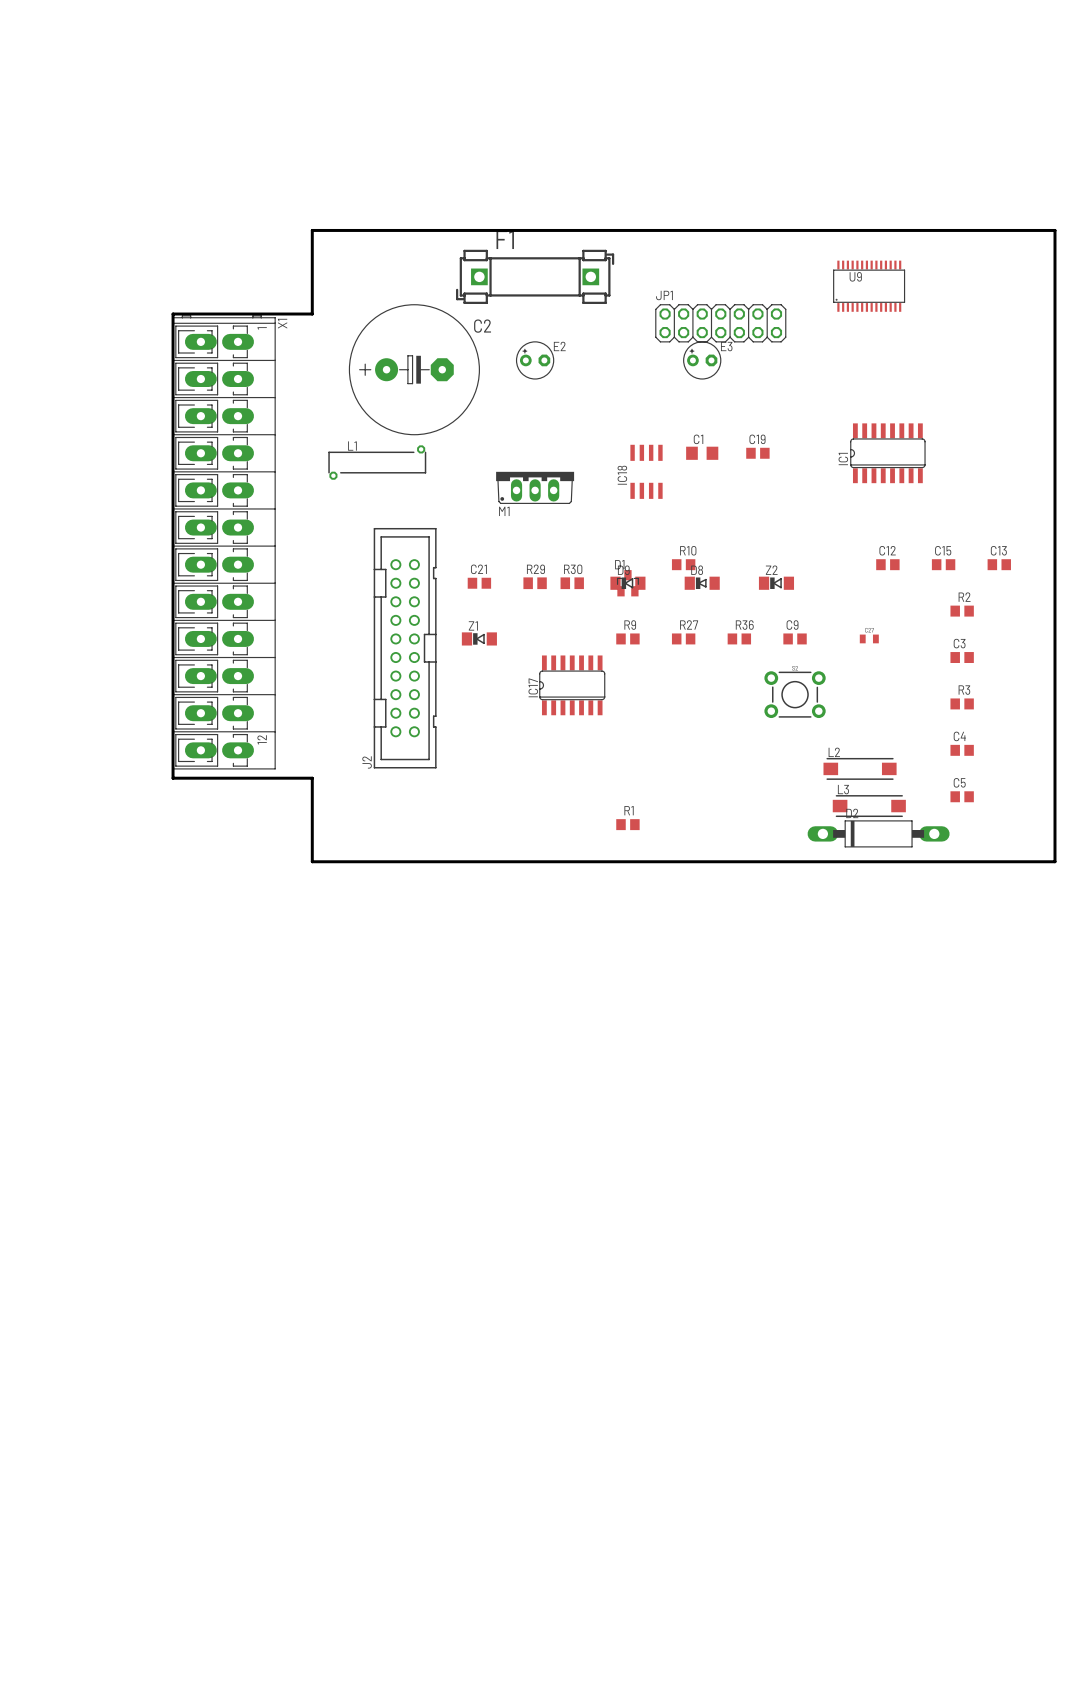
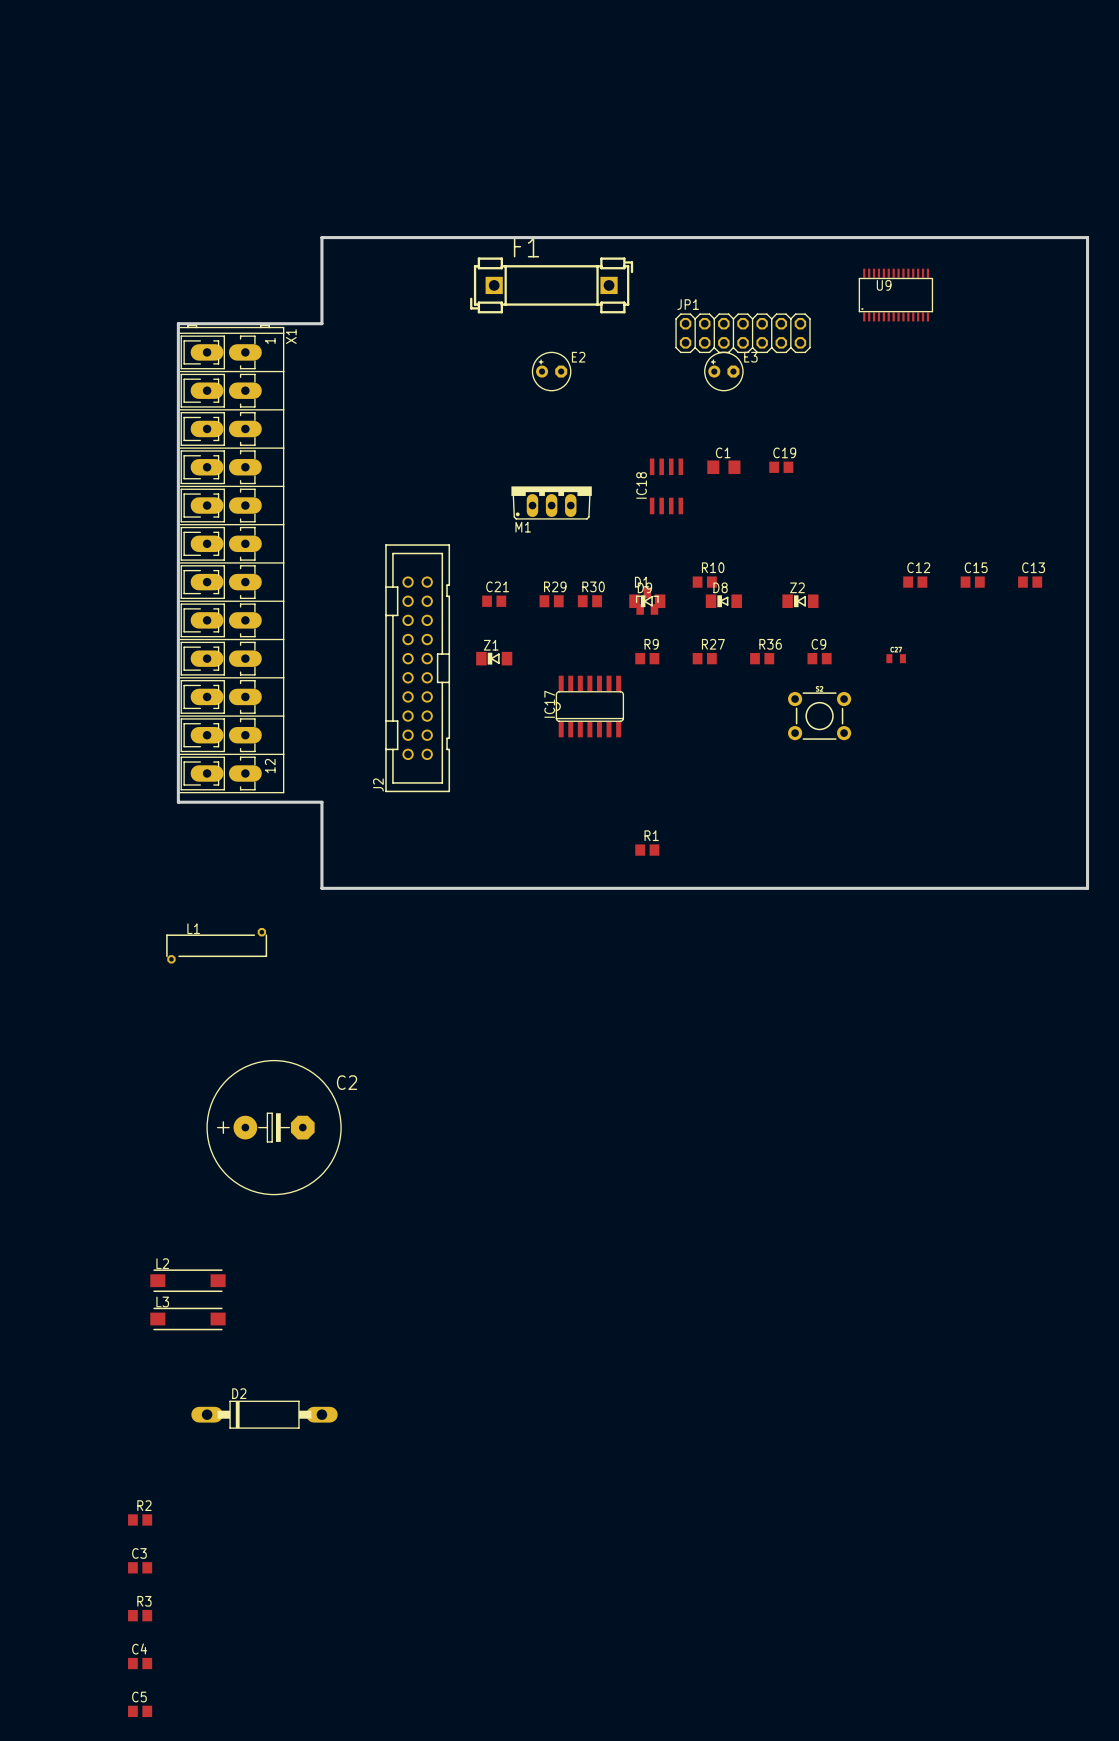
C2 position: (414, 369) -> (274, 1127)
IC1: (887, 453) -> none
L1 position: (377, 462) -> (216, 945)
R2 position: (962, 611) -> (140, 1519)
C3 position: (962, 657) -> (140, 1567)
R3 position: (962, 703) -> (140, 1615)
C4 position: (962, 750) -> (140, 1663)
L2 position: (860, 768) -> (187, 1280)
C5 position: (962, 796) -> (140, 1711)
L3 position: (869, 806) -> (187, 1318)
D2 position: (878, 833) -> (264, 1414)

